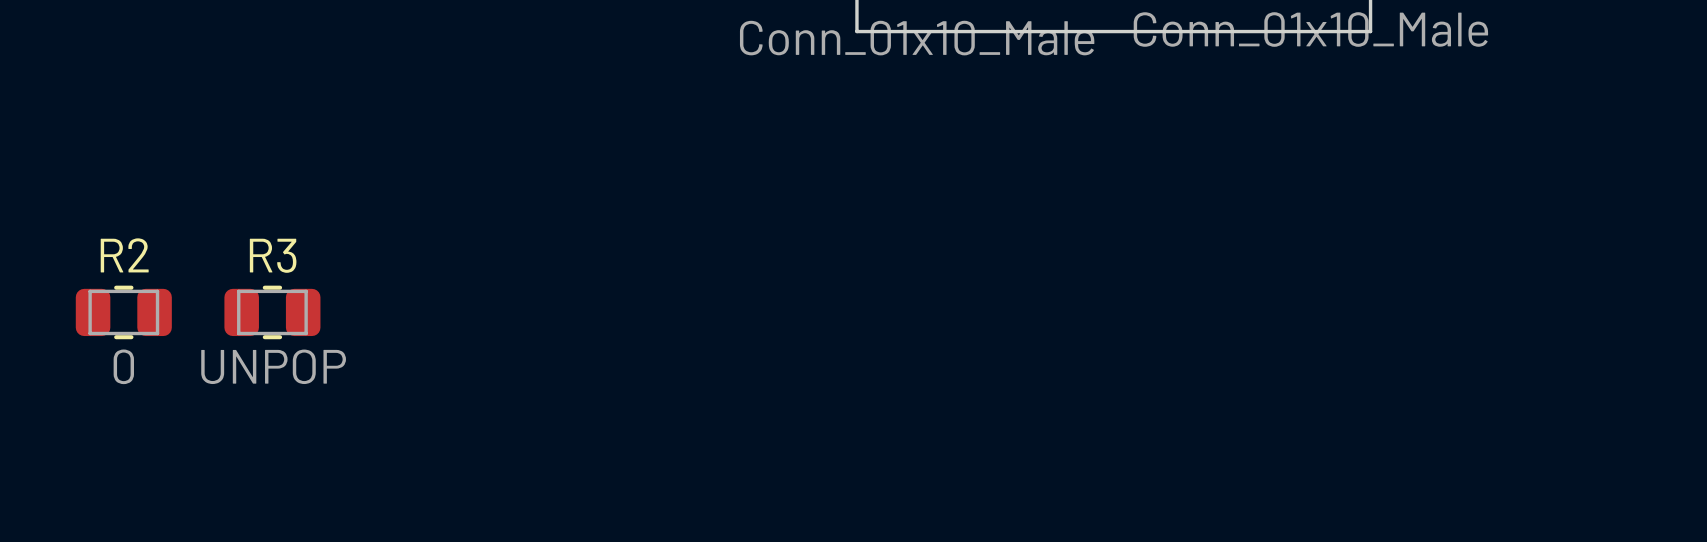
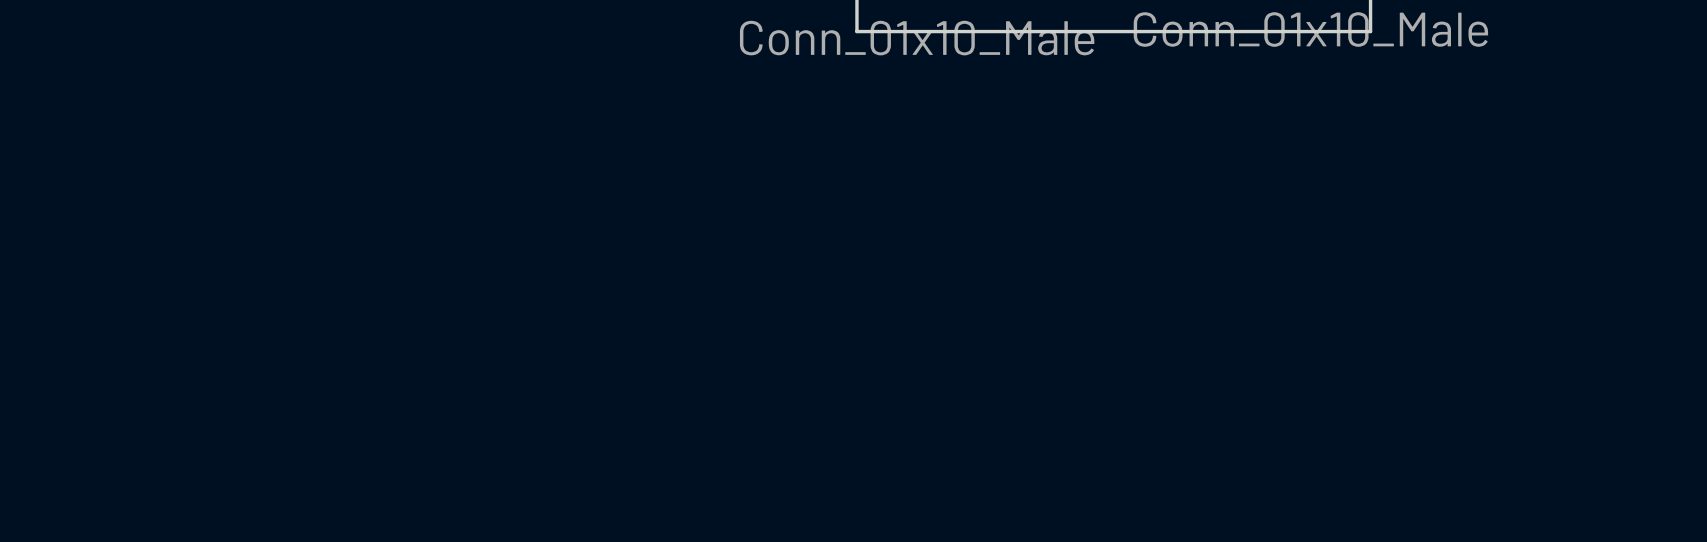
R2: 0 (123, 312) -> none
R3: UNPOP (272, 312) -> none

